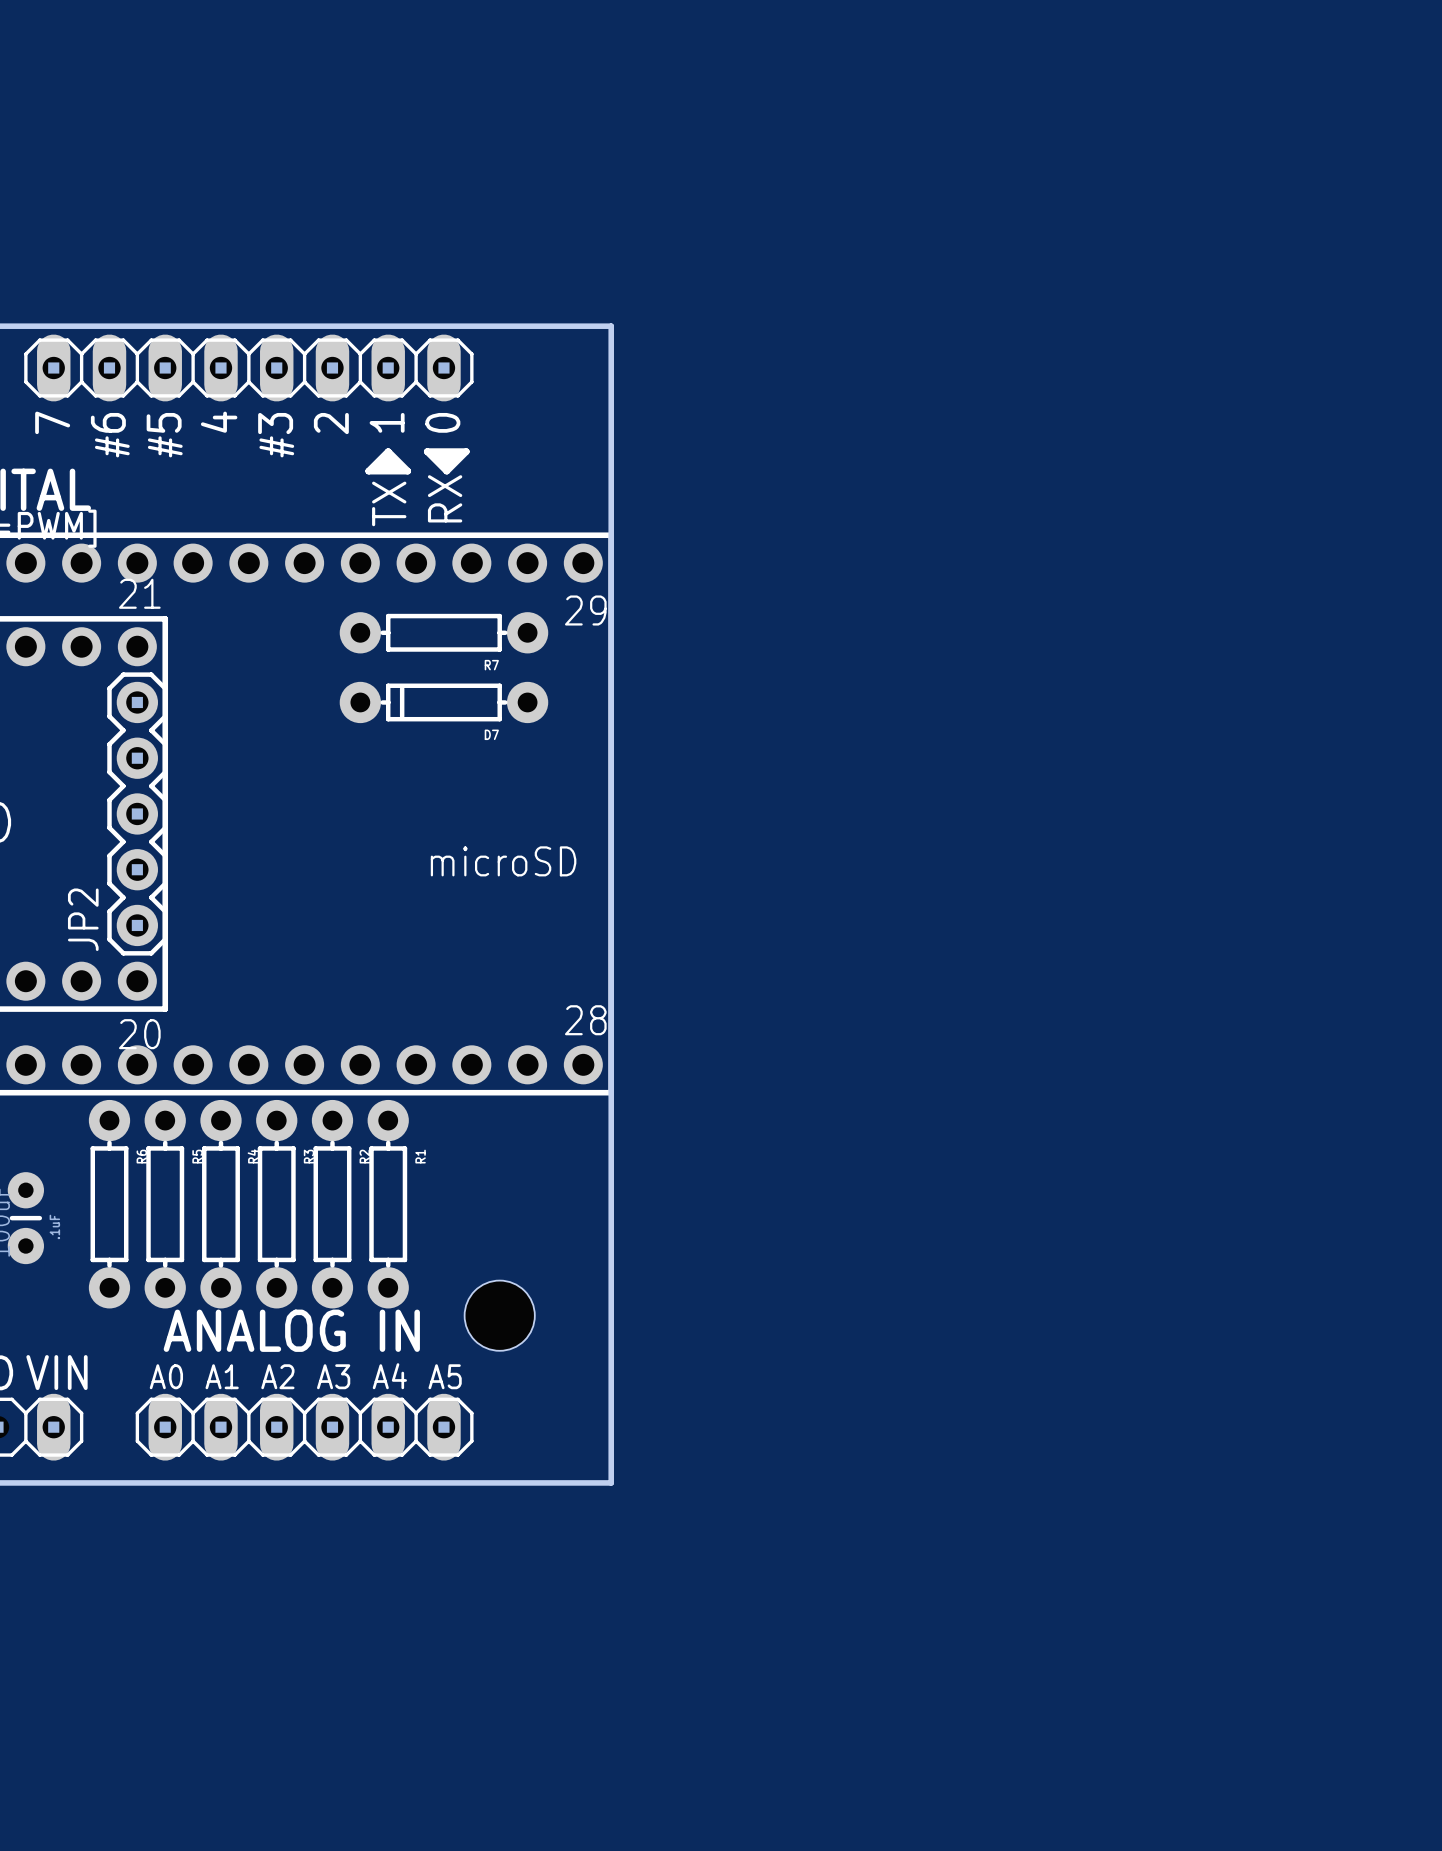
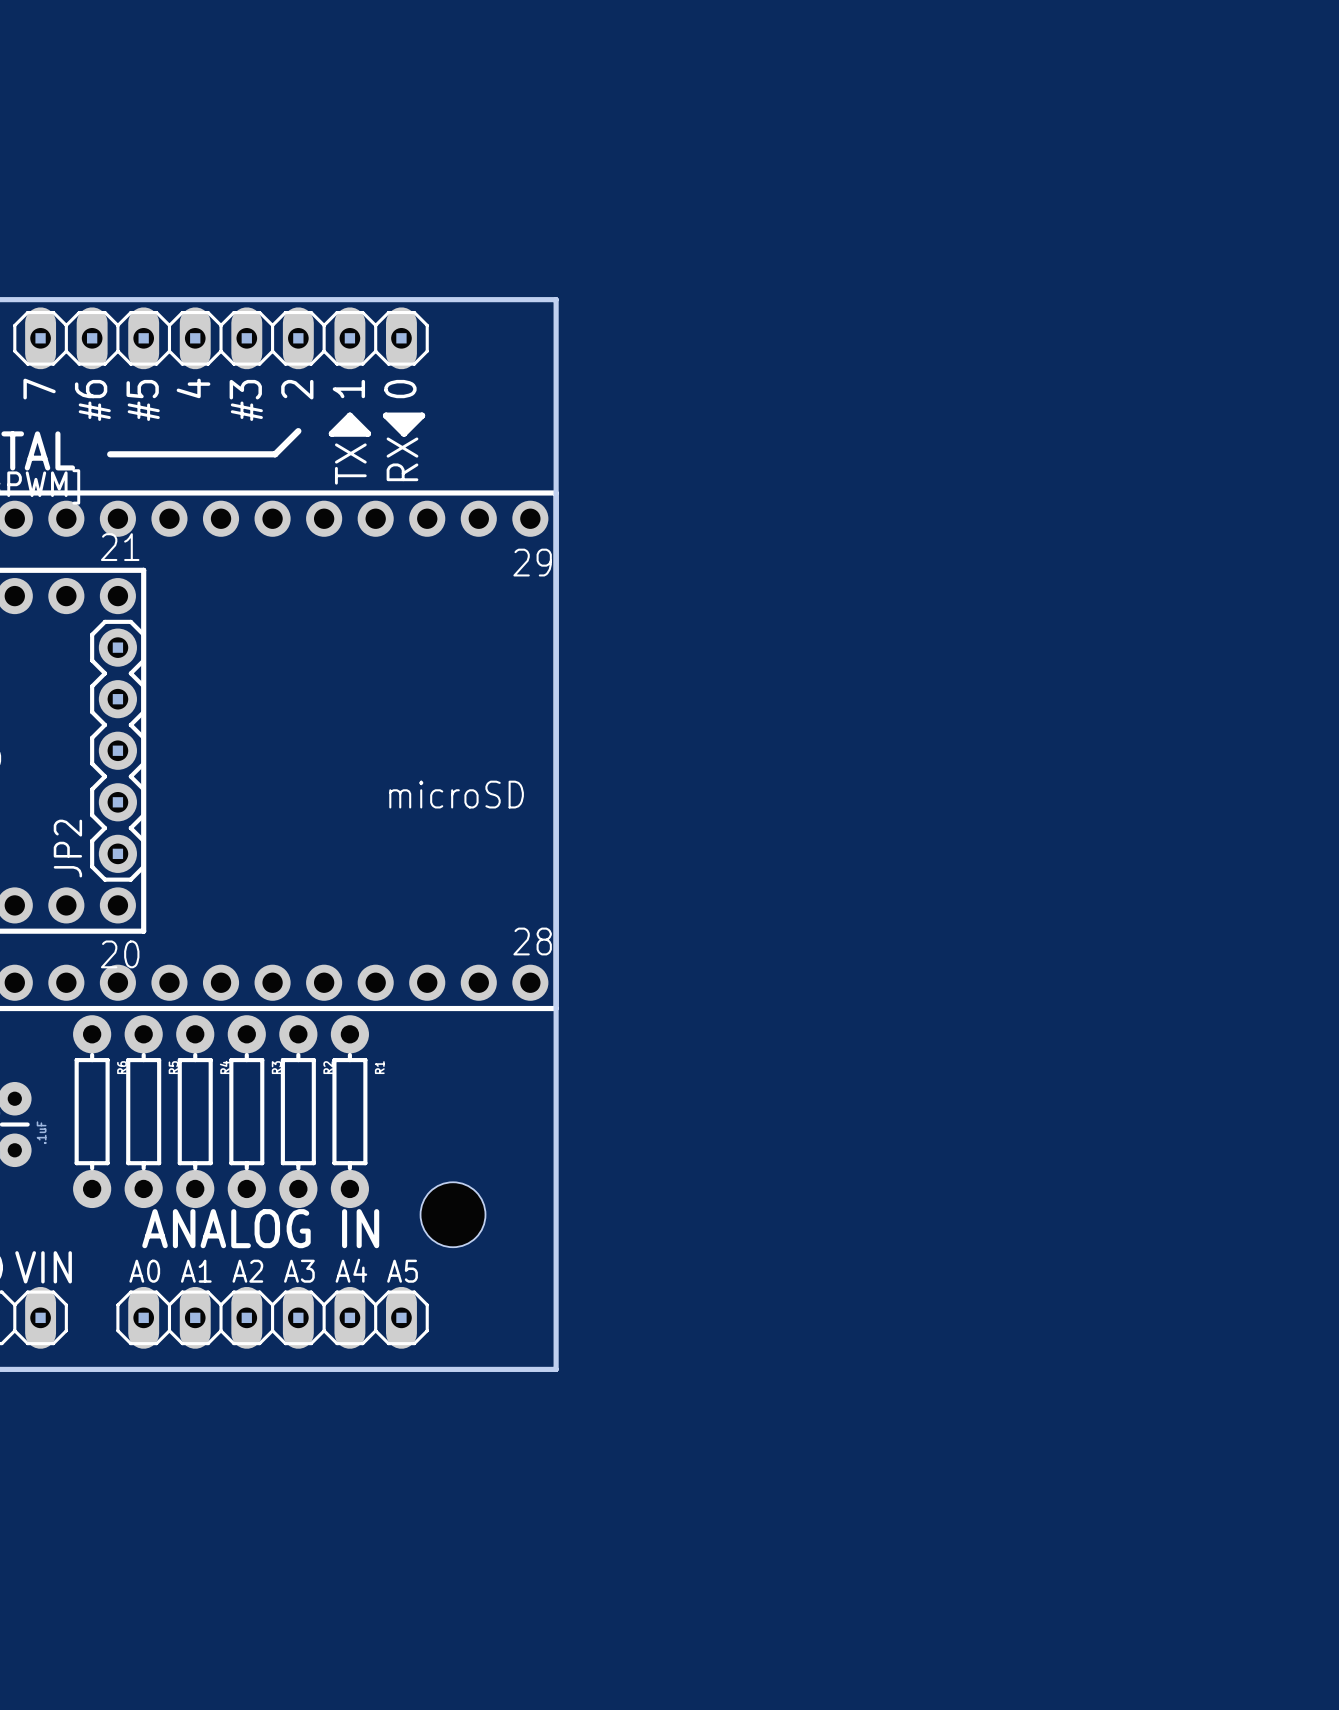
line: none -> (298, 431) (275, 454) (110, 454)
R7: (443, 632) -> none
D7: (443, 702) -> none

